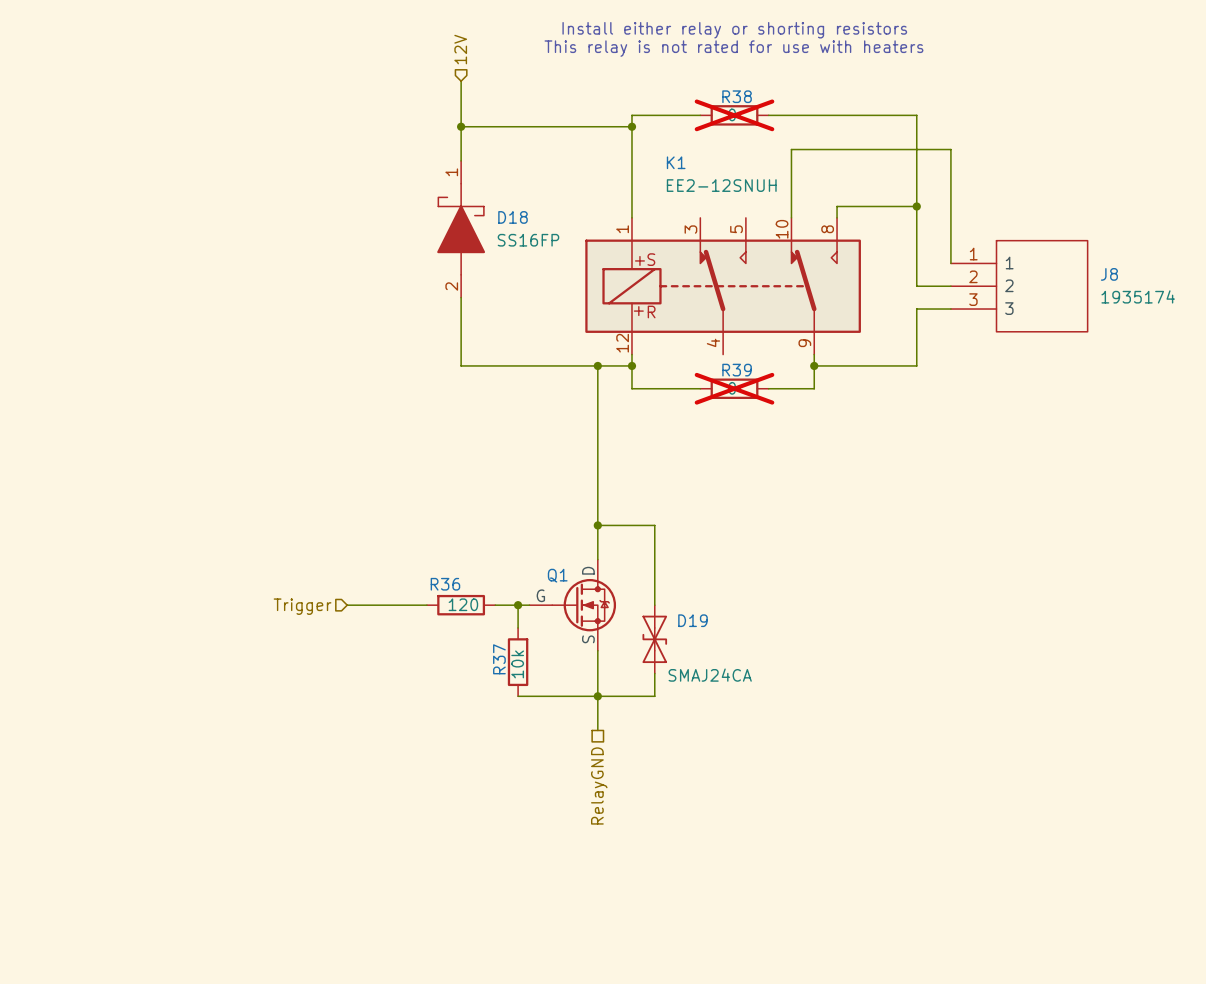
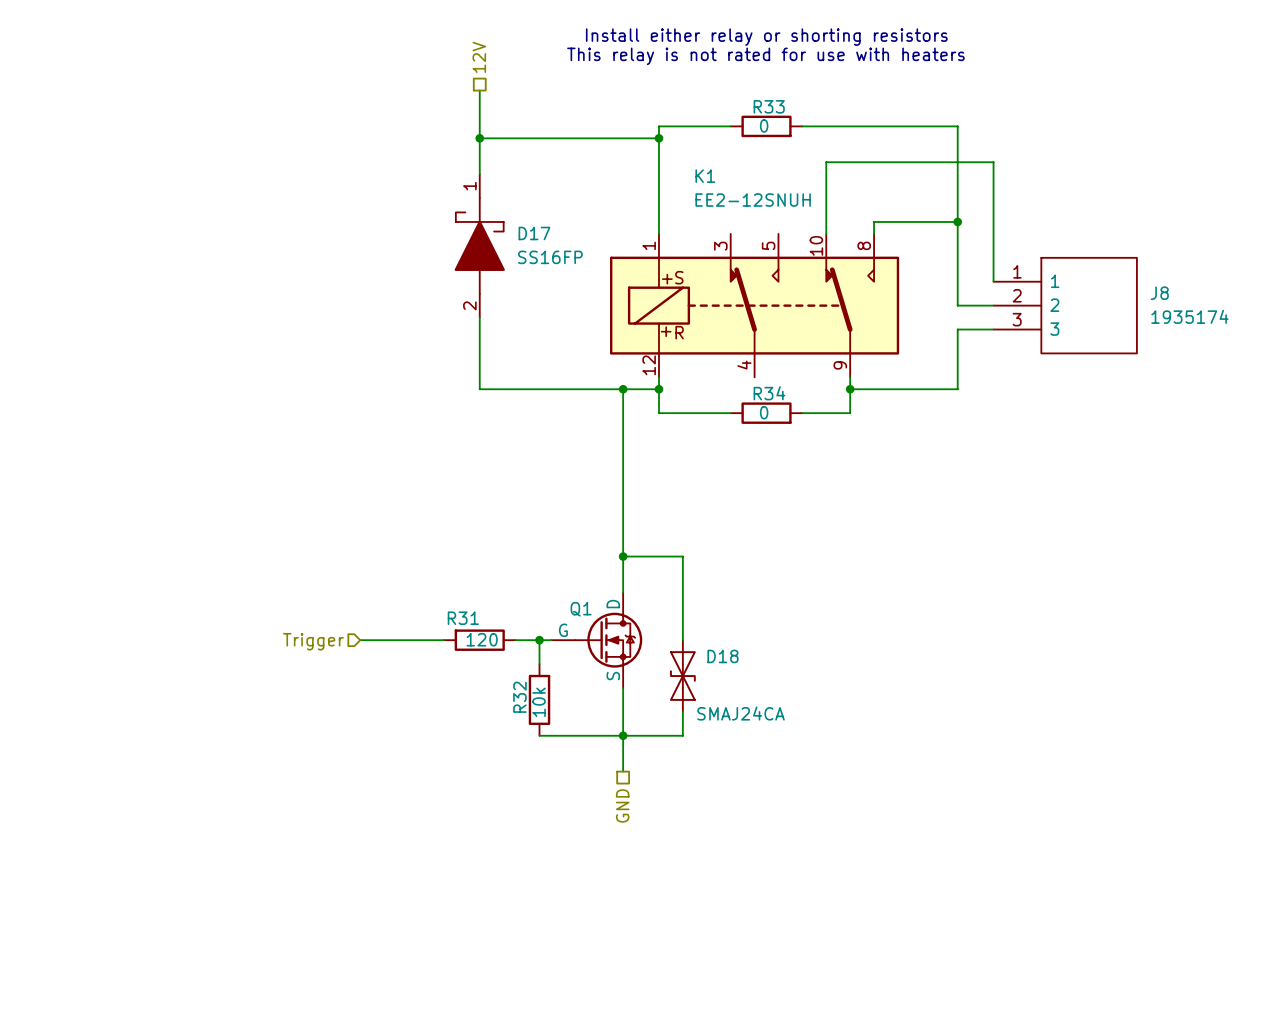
hierarchical label shape: input (460, 49) -> passive (479, 57)
R38 name: R38 (737, 96) -> R33 (769, 106)
R38 do-not-place cross: (734, 115) -> none
D18 name: D18 (513, 217) -> D17 (534, 233)
R39 name: R39 (737, 370) -> R34 (769, 393)
R39 do-not-place cross: (734, 388) -> none
R36 name: R36 (445, 584) -> R31 (463, 618)
D19 name: D19 (692, 620) -> D18 (722, 656)
R37 name: R37 (499, 659) -> R32 (519, 697)
hierarchical label: RelayGND (599, 785) -> GND (622, 805)

